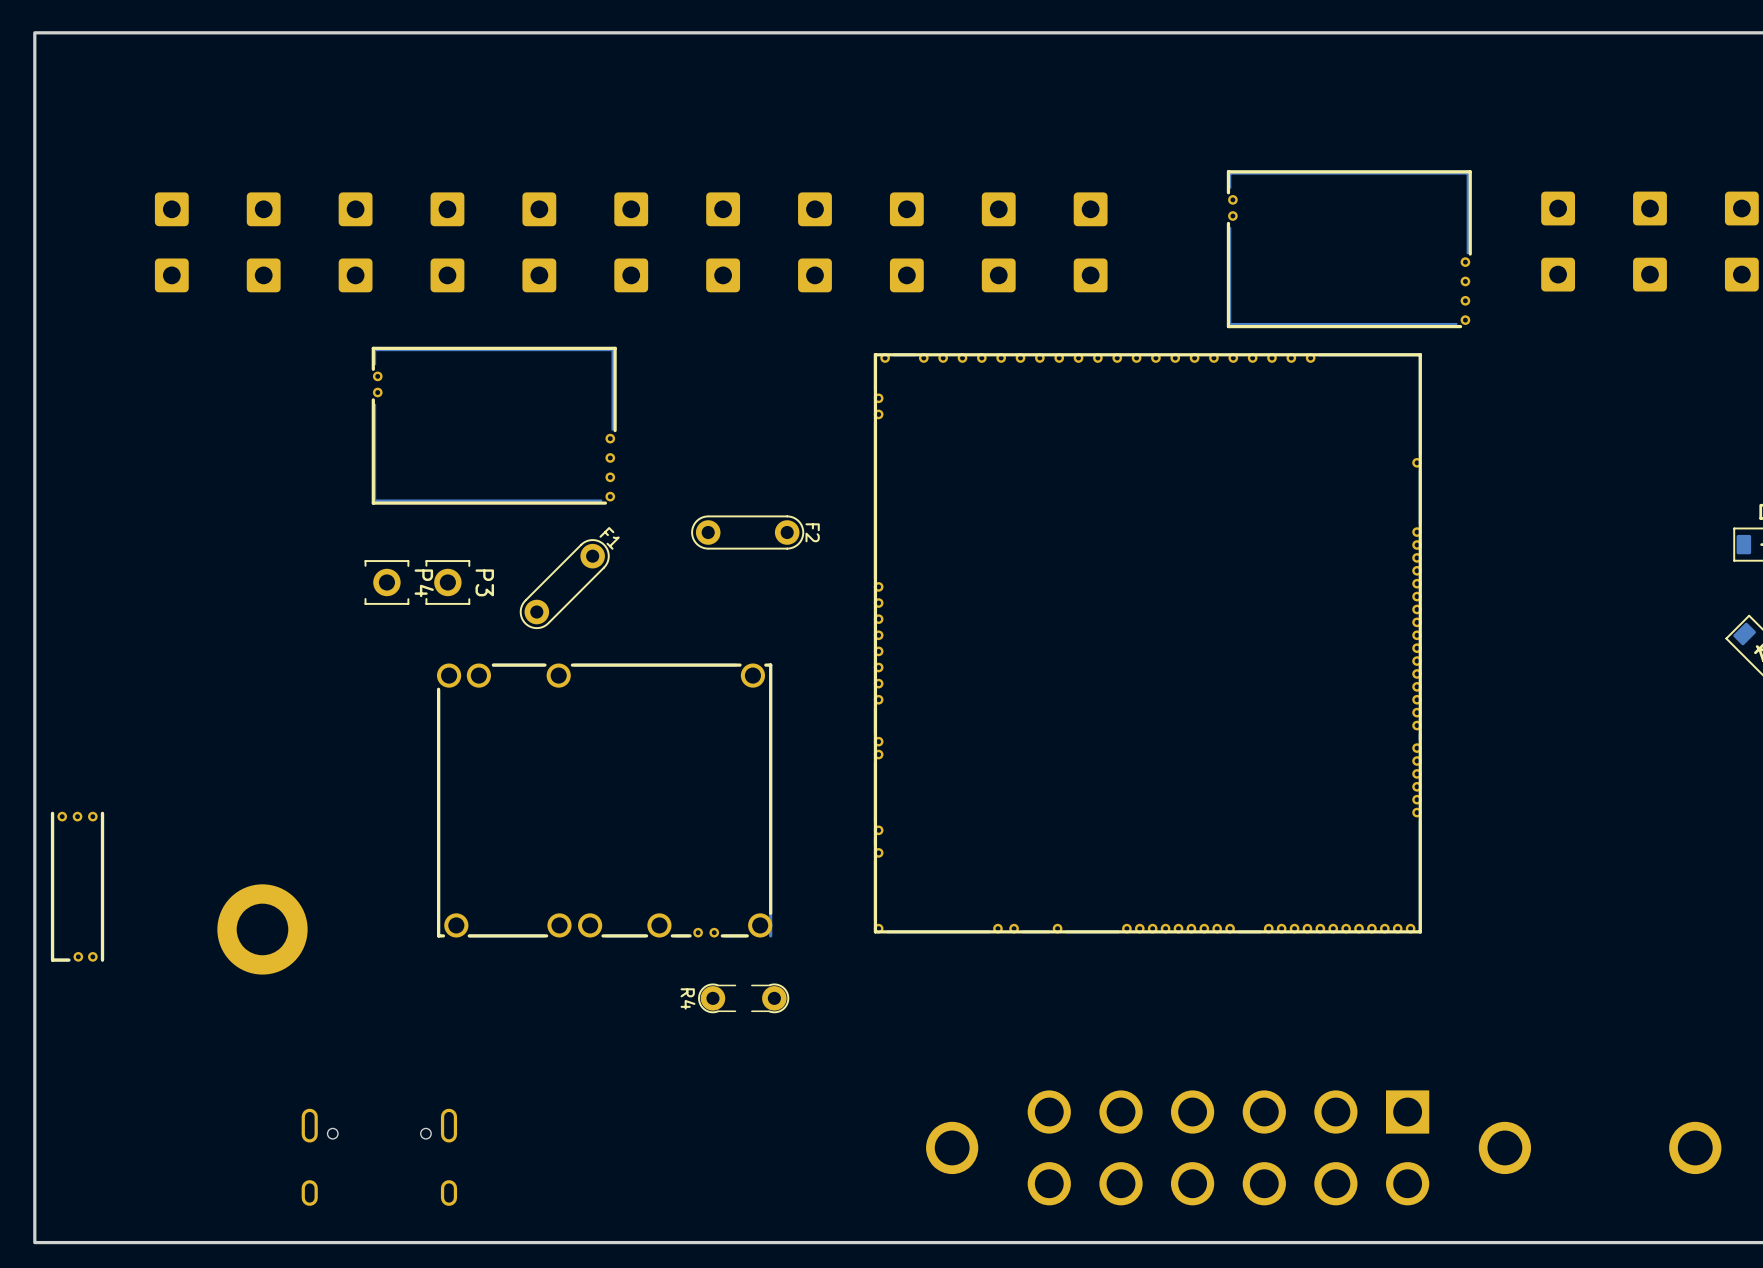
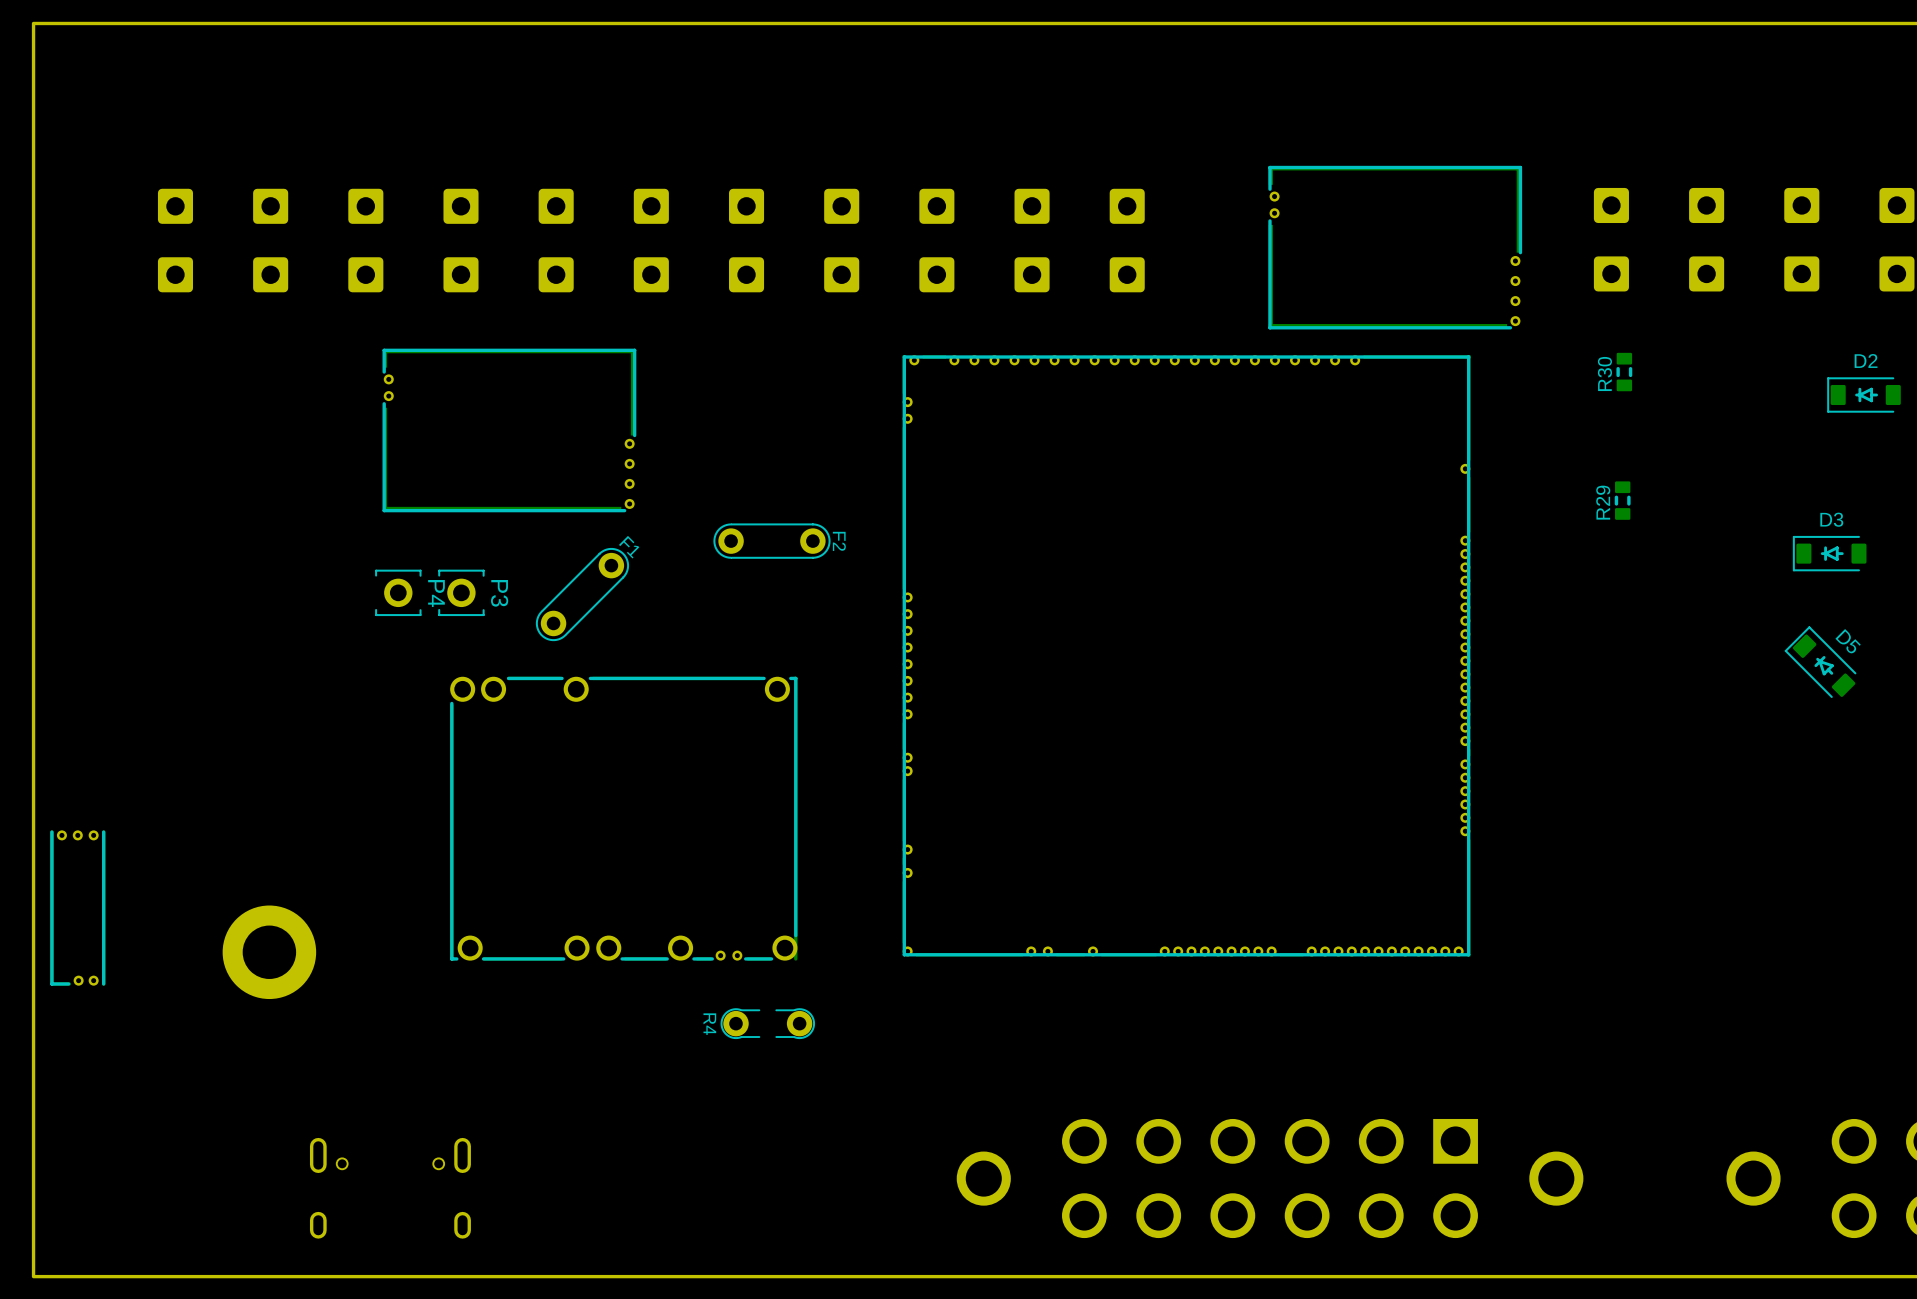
R30: none -> (1624, 372)
R29: none -> (1622, 500)

